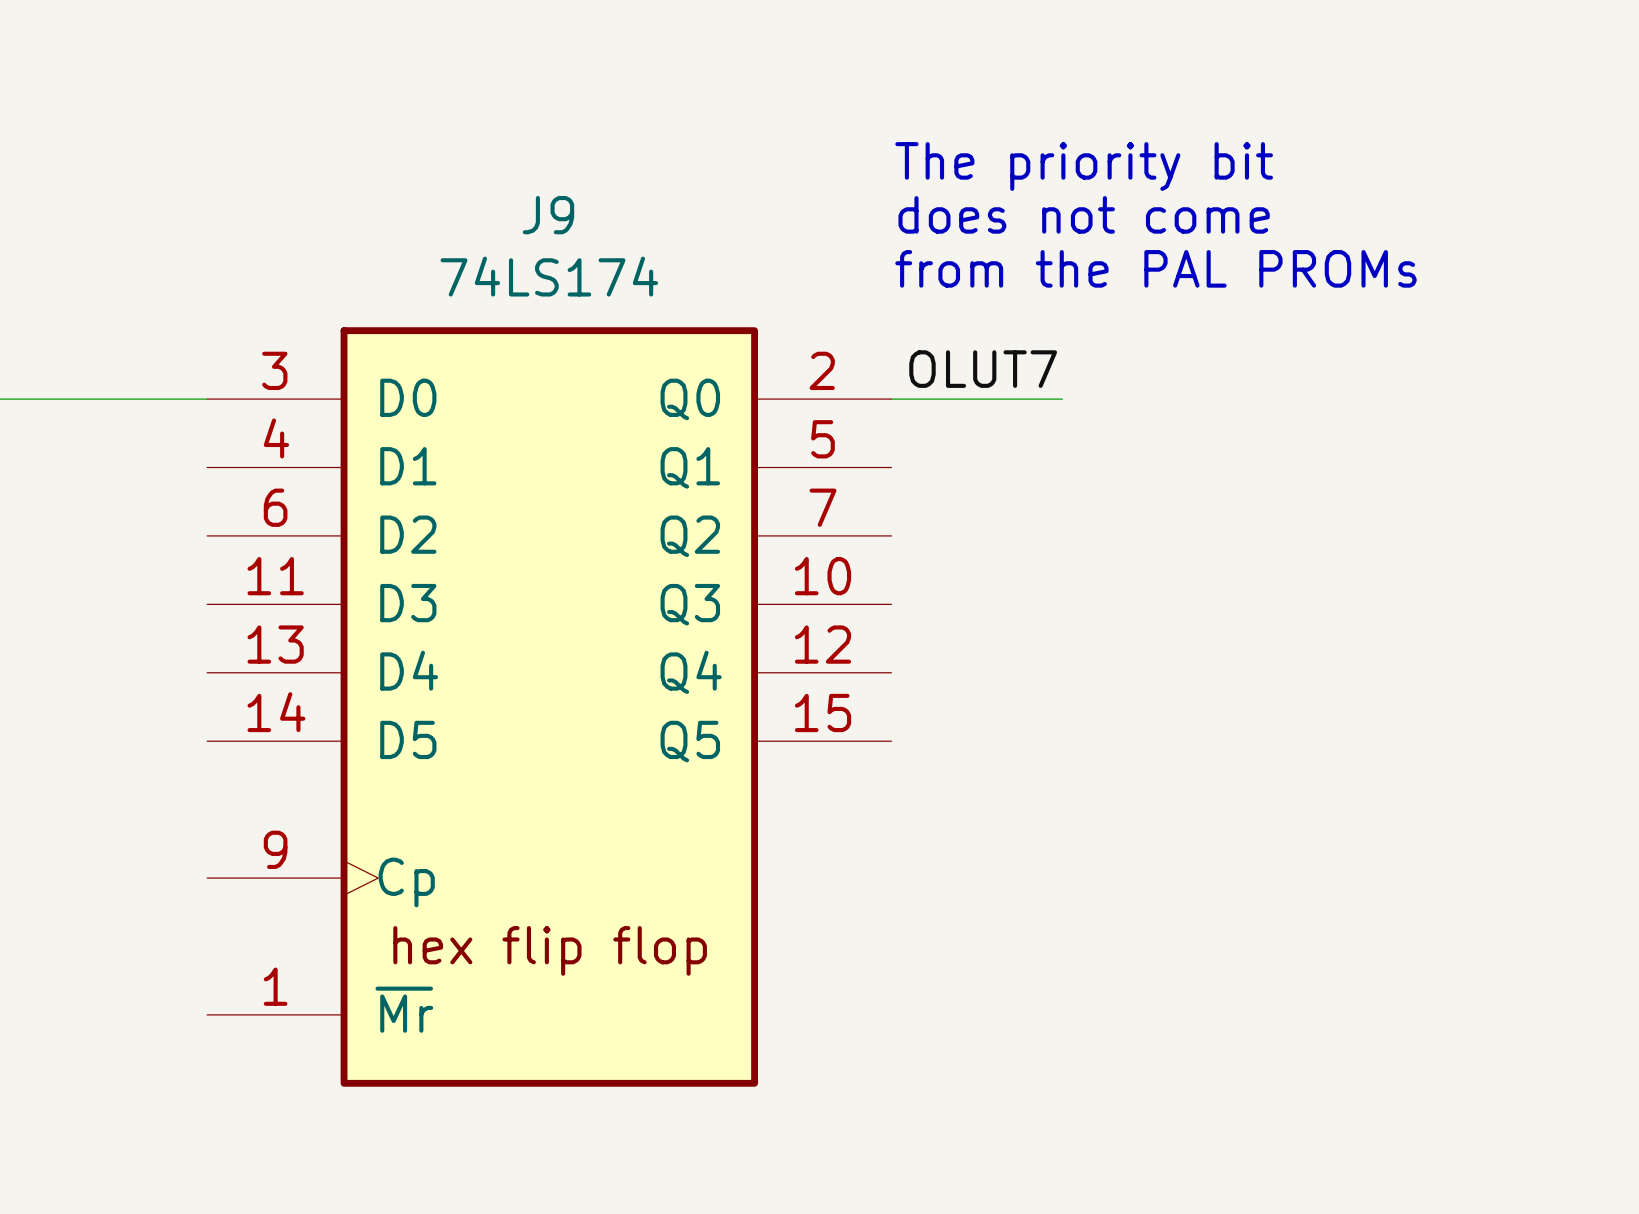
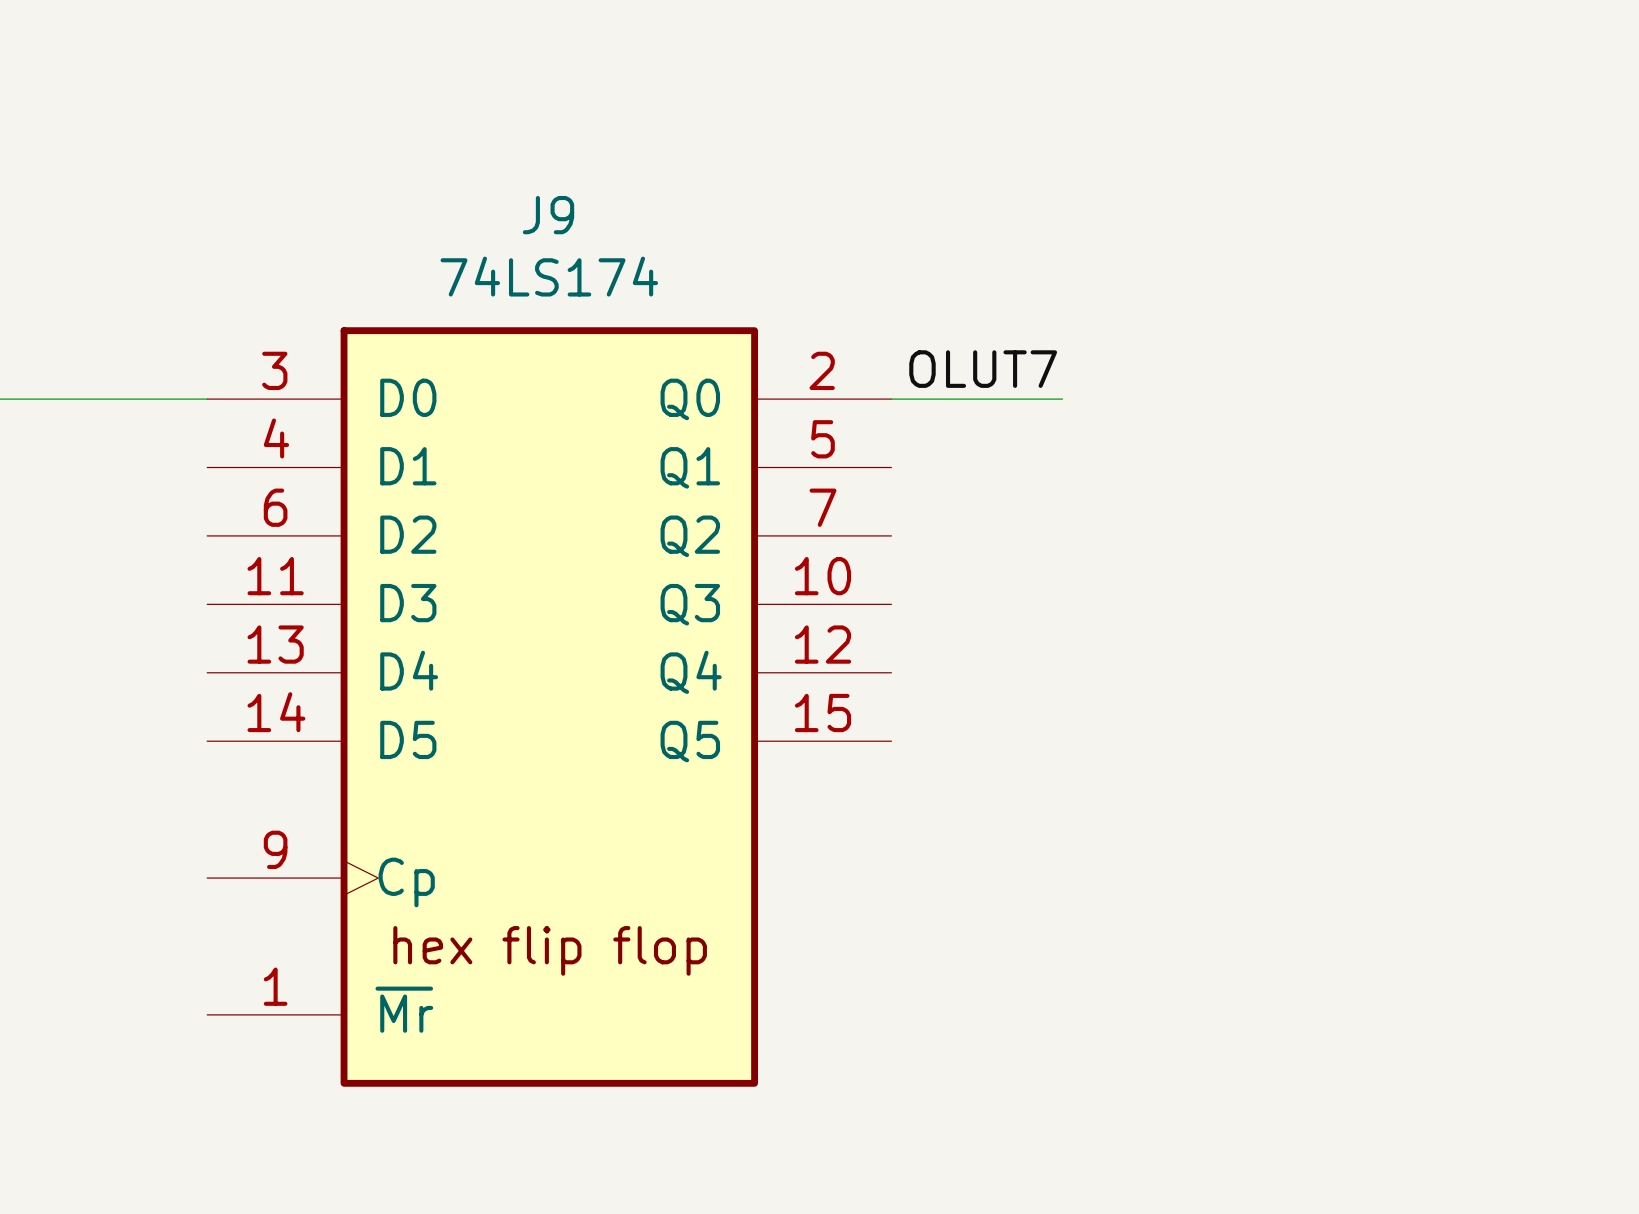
text: The priority bit (1084, 166) -> none
text: does not come (1084, 214) -> none
text: from the PAL PROMs (1155, 268) -> none

